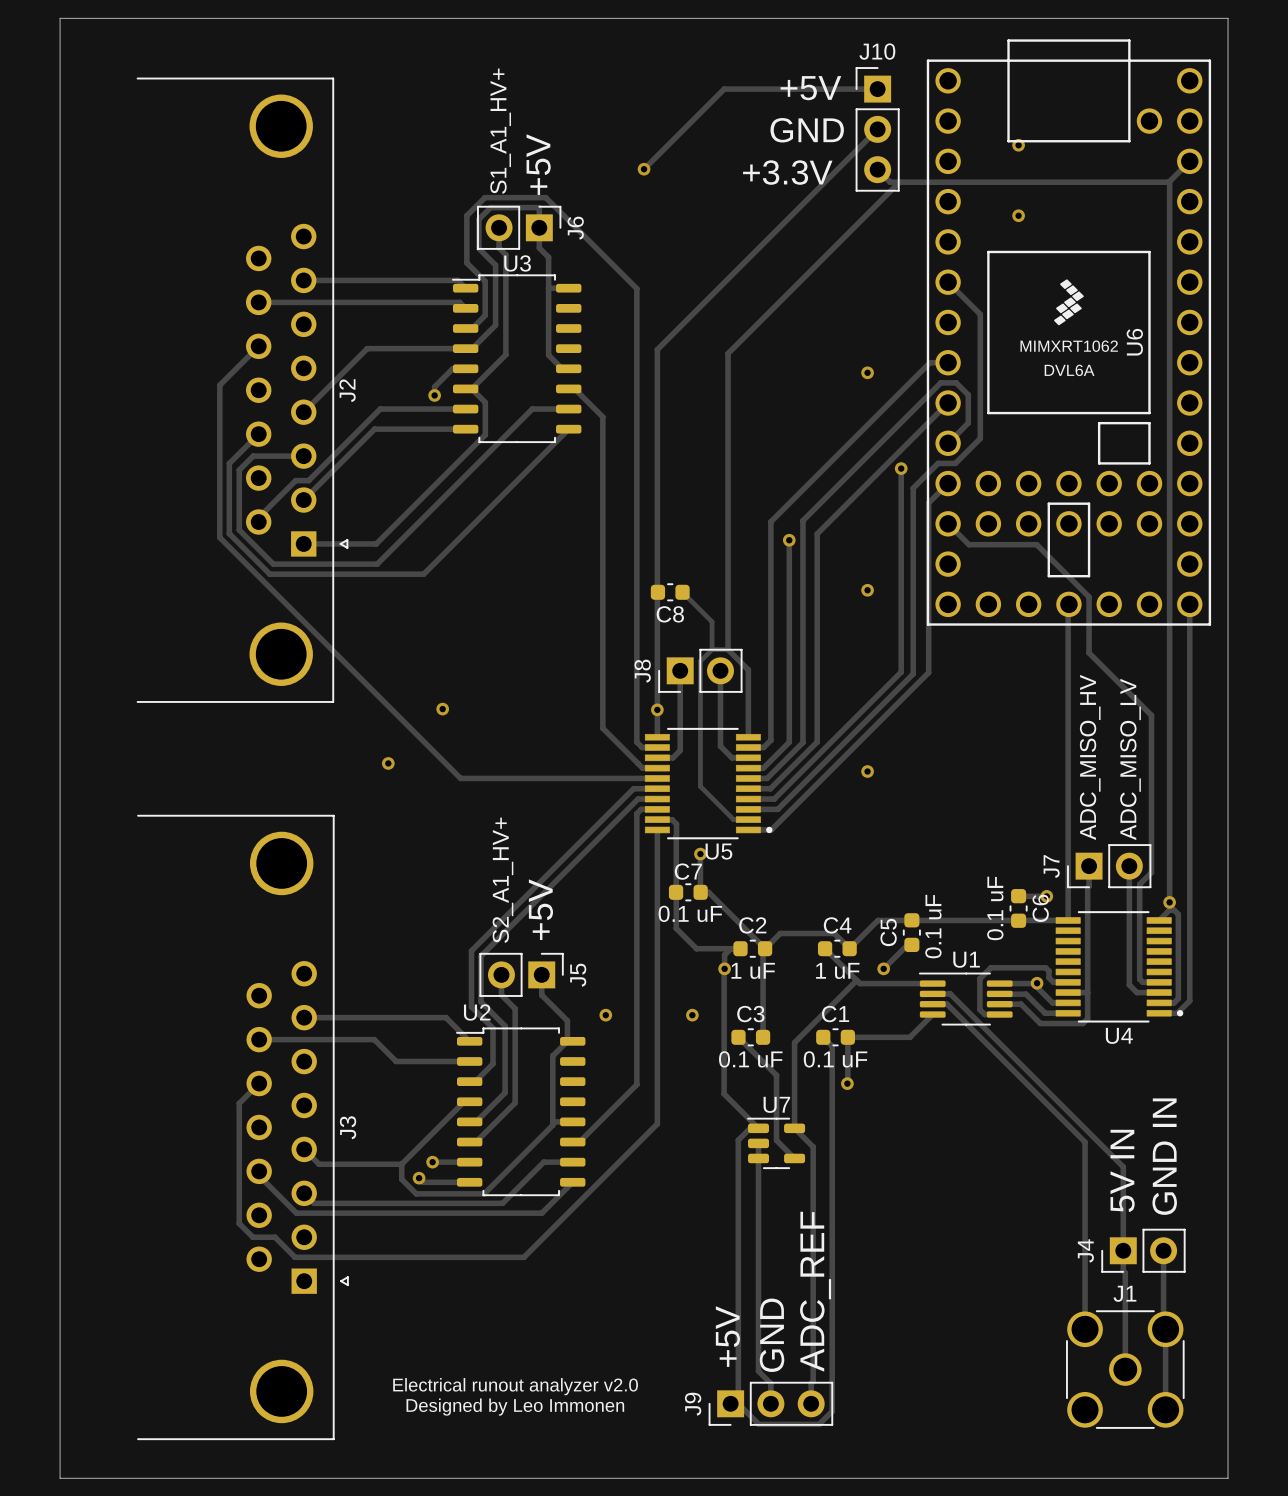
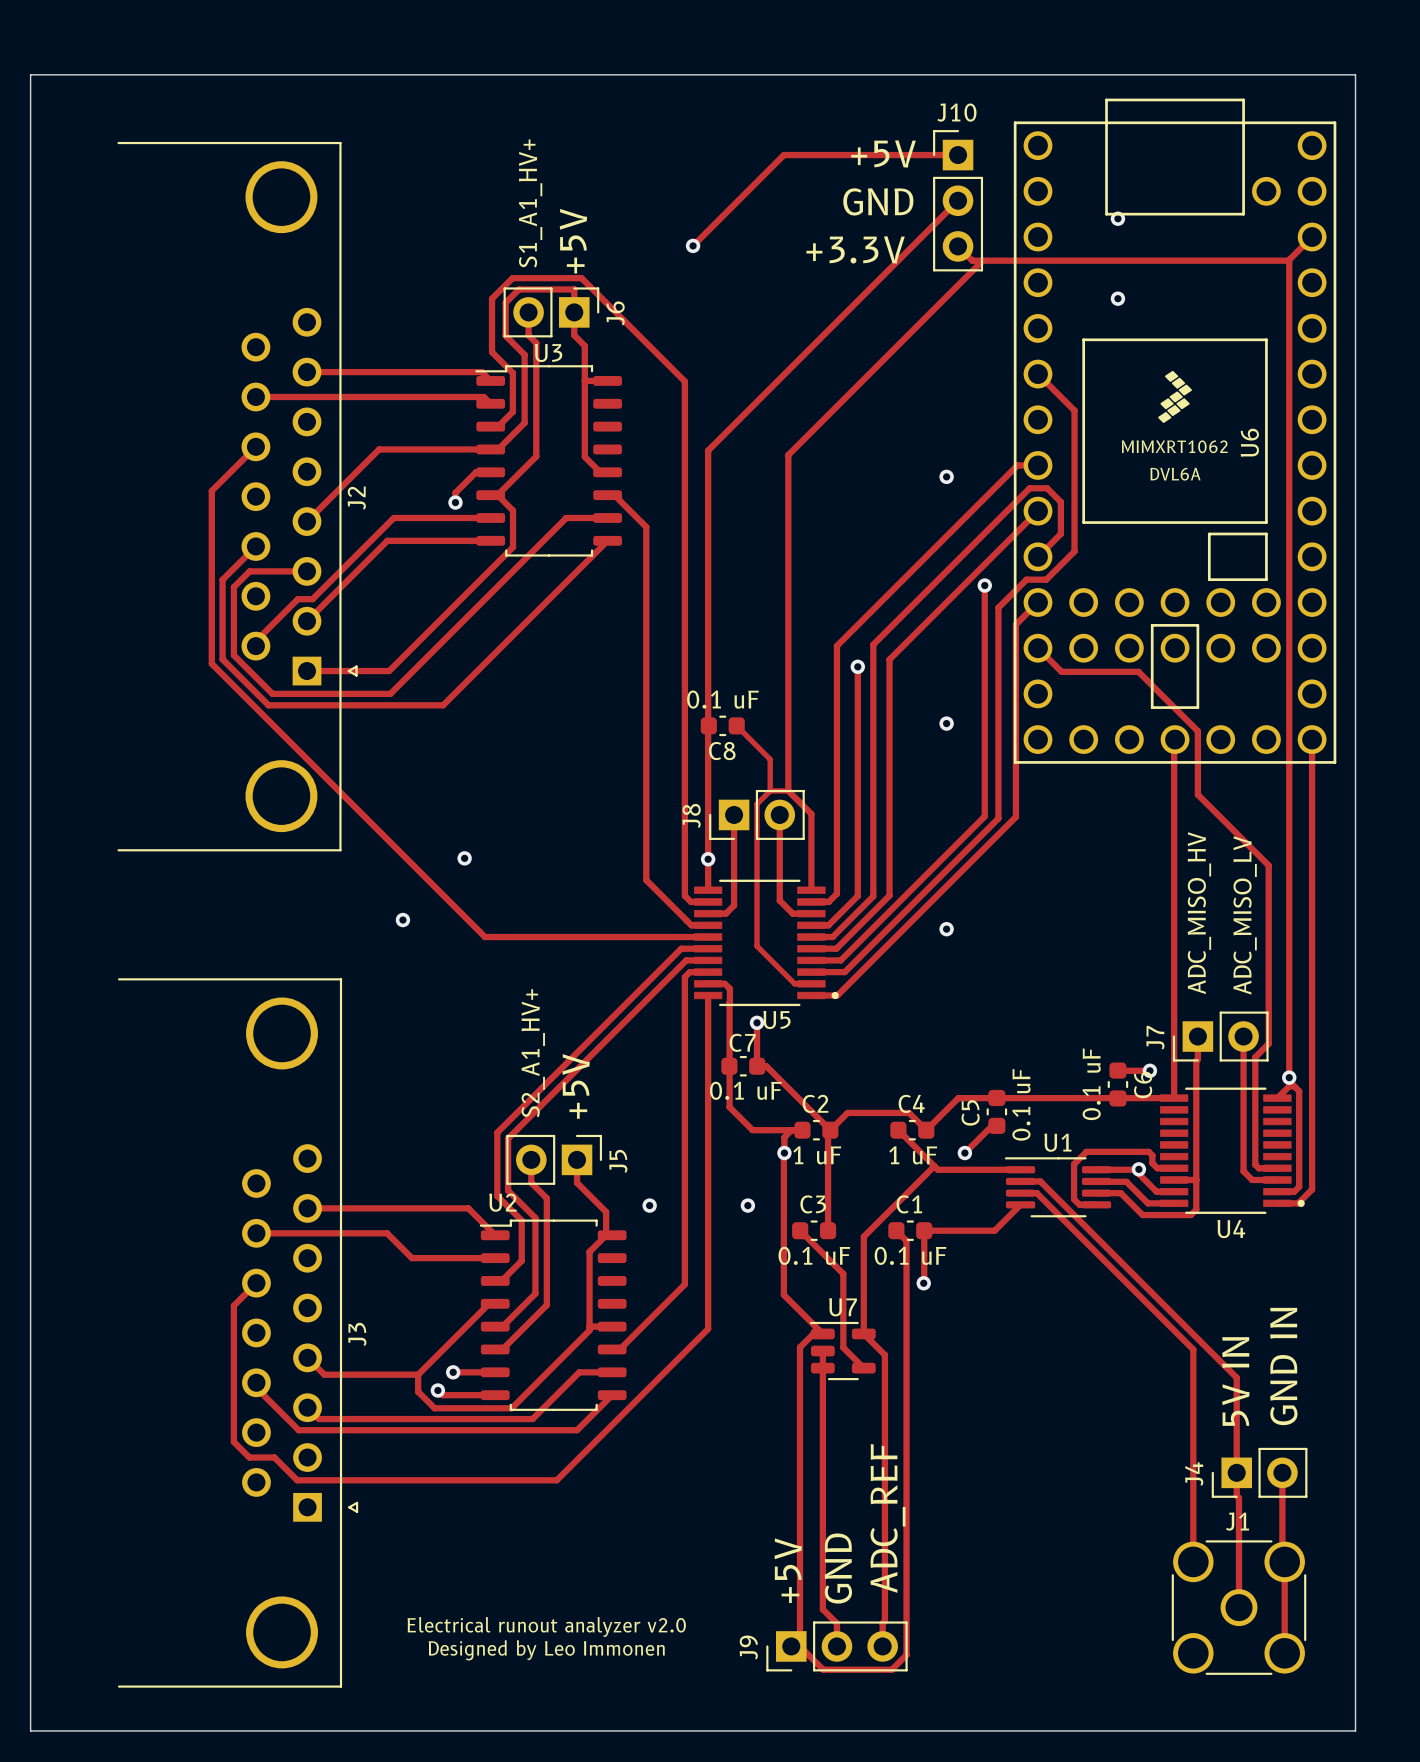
C8 value: none -> 0.1 uF (722, 699)

